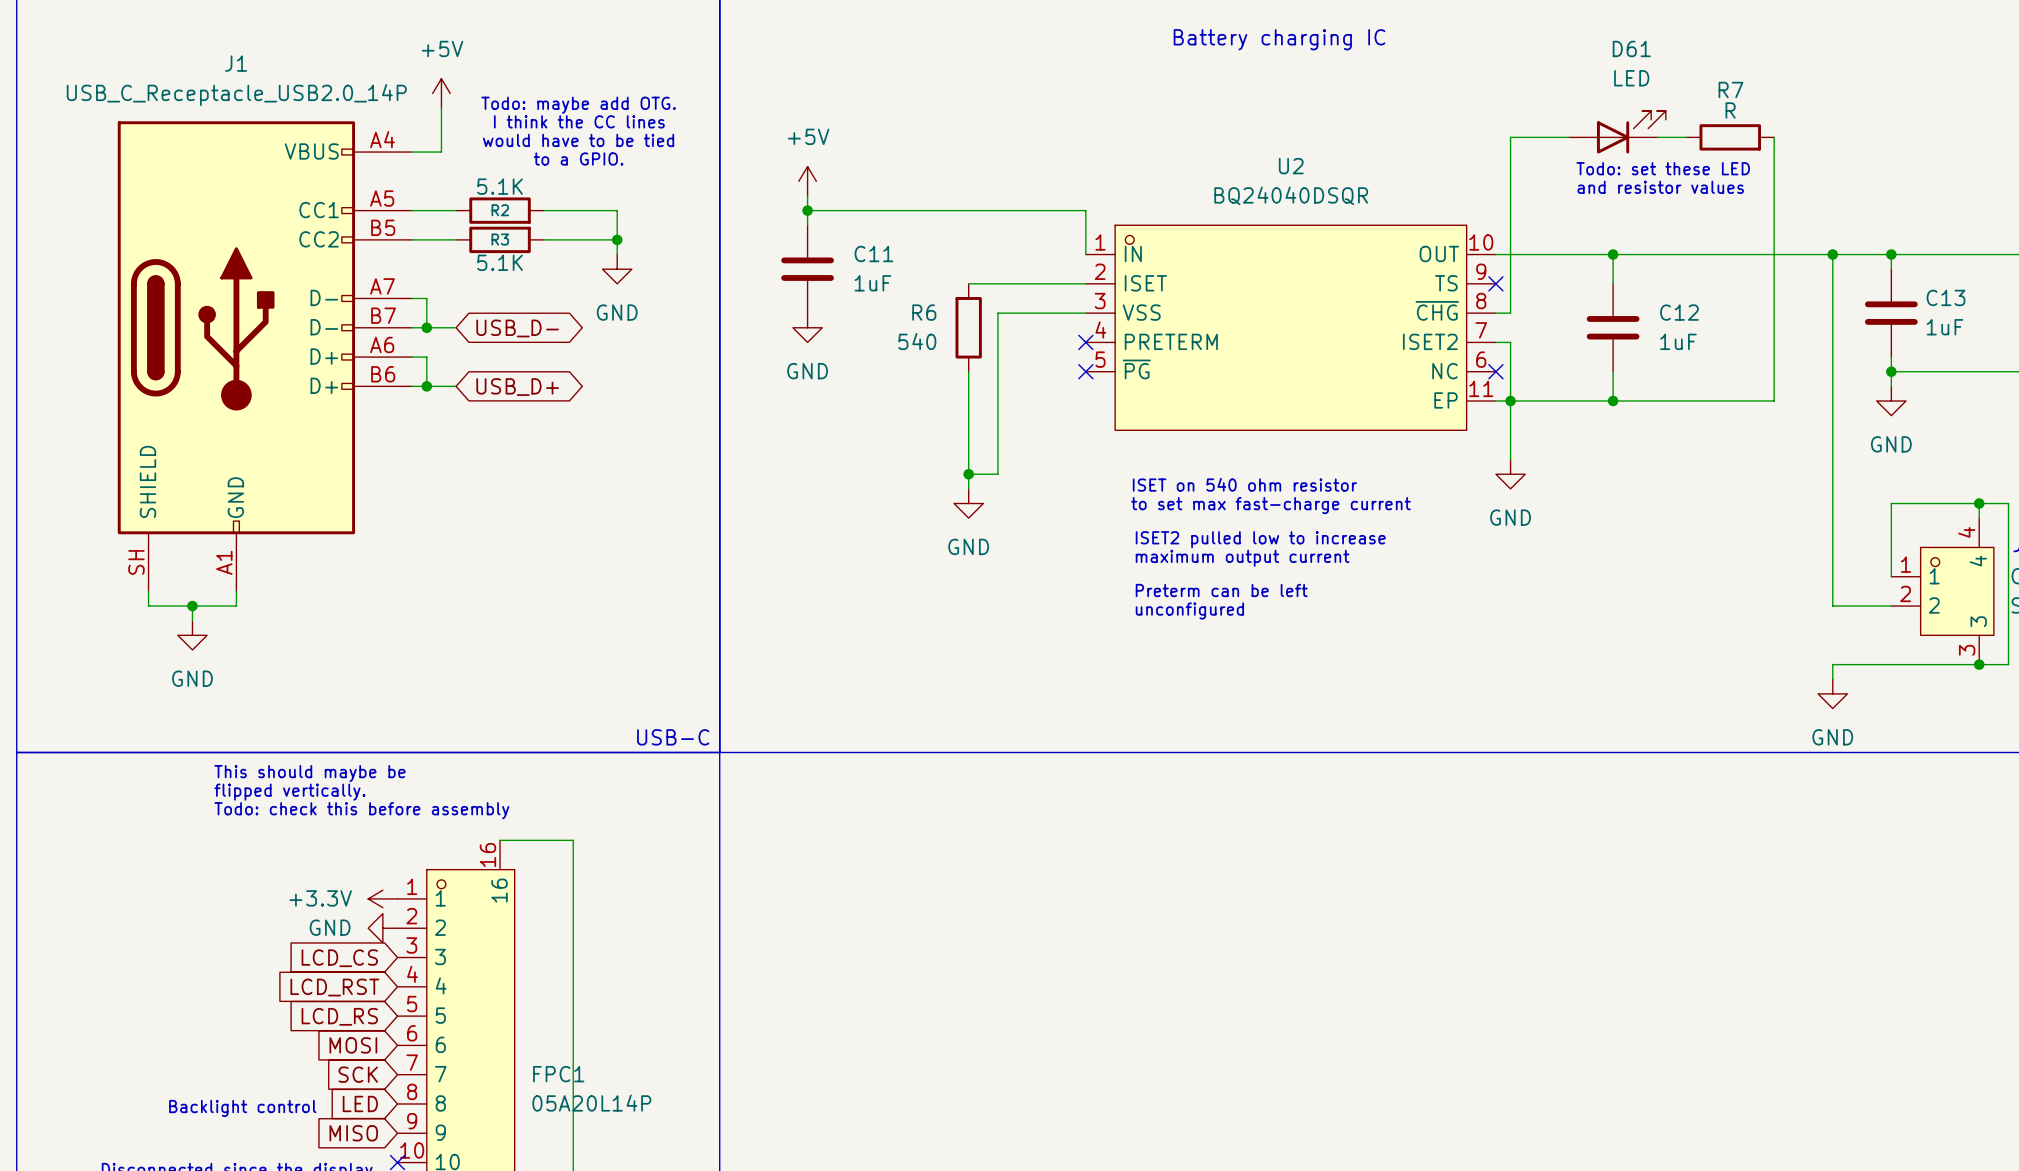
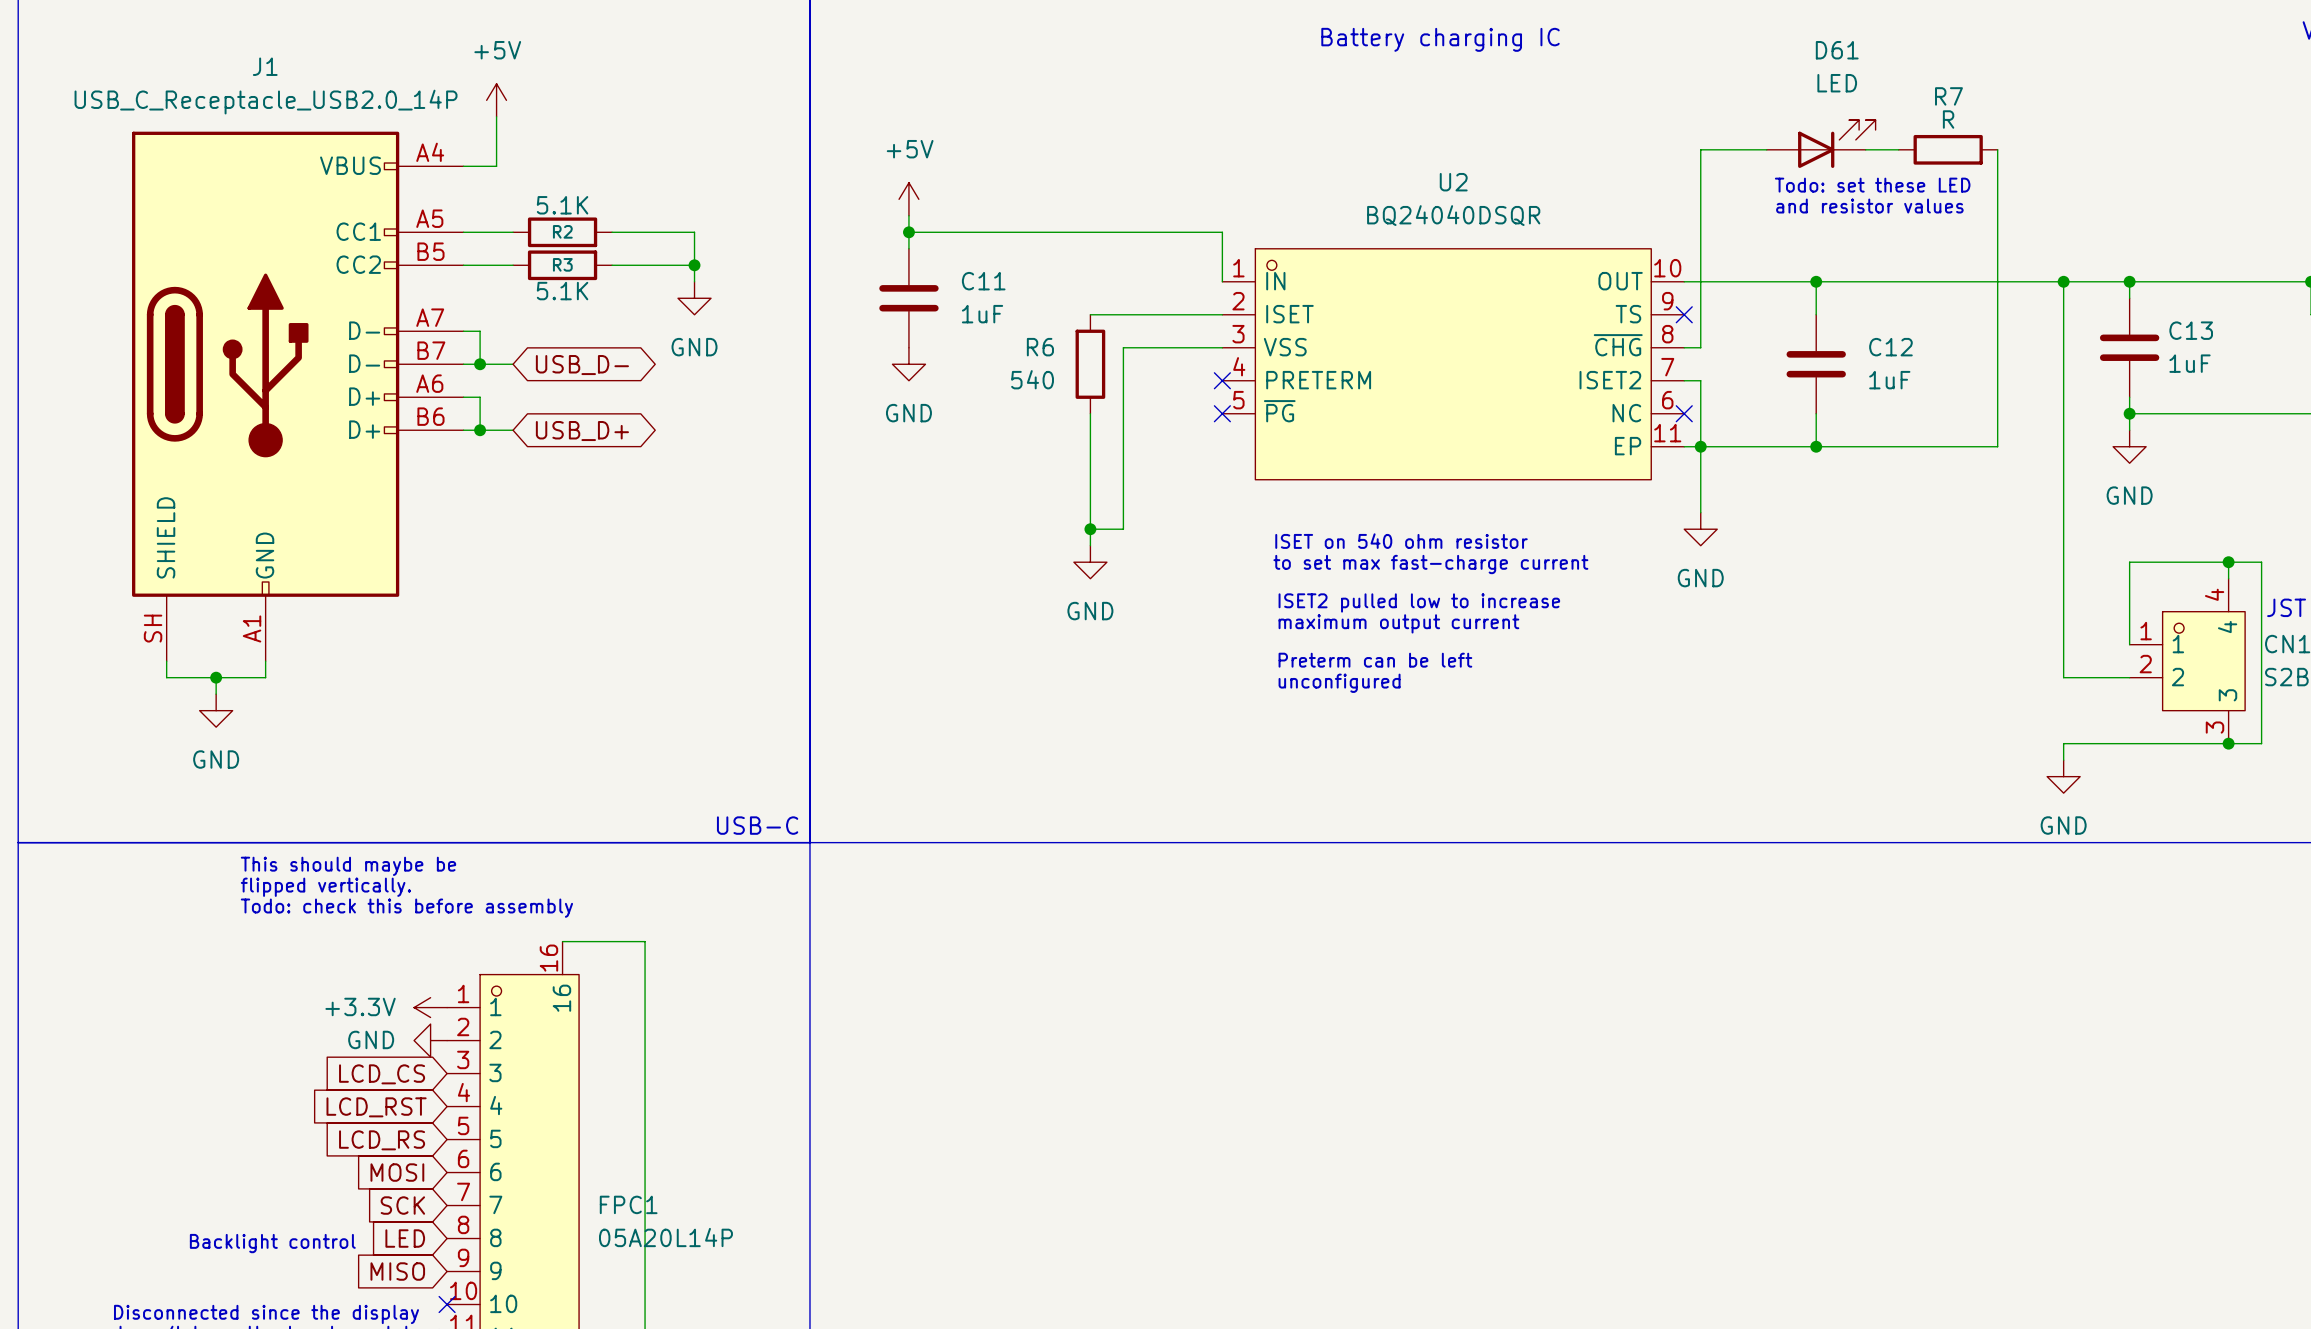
text: Todo: maybe add OTG. (578, 105) -> none
text: I think the CC lines (579, 121) -> none
text: would have to be tied (578, 140) -> none
text: to a GPIO. (578, 158) -> none

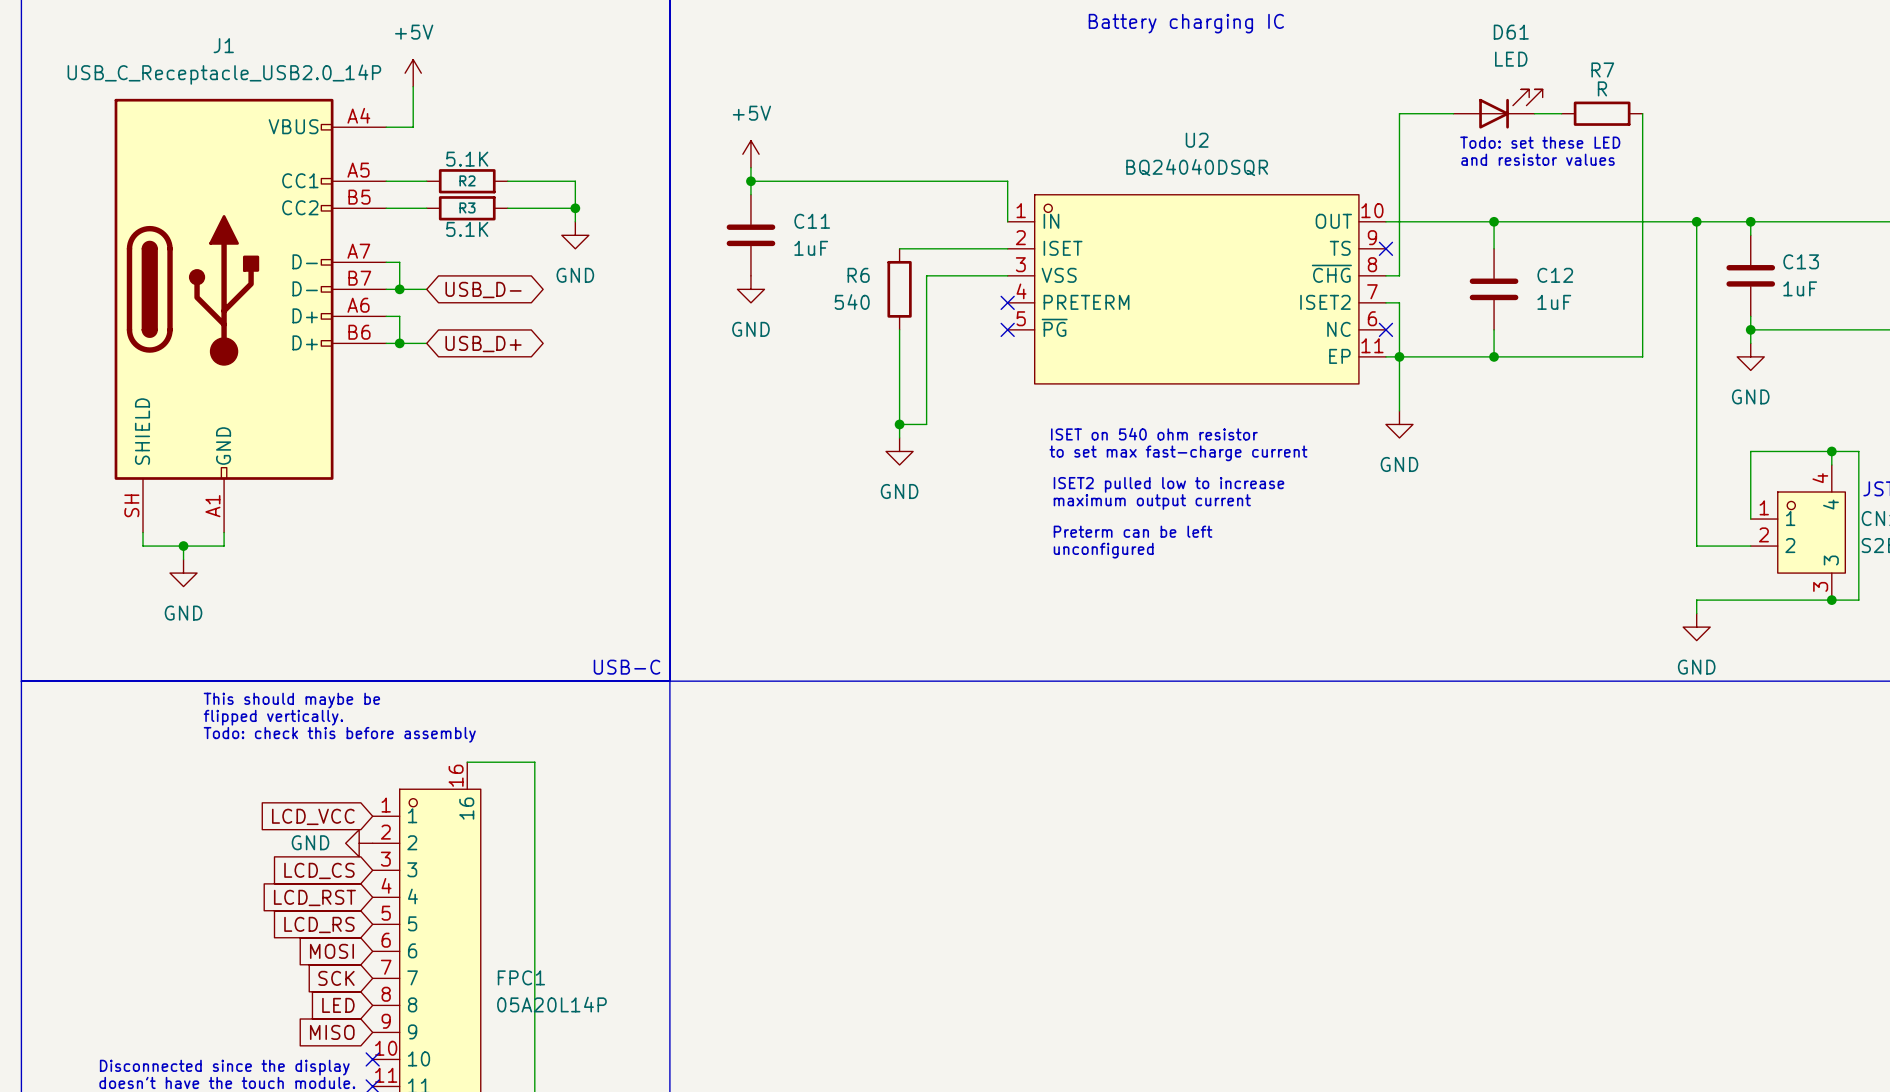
power symbol: +3.3V (430, 1007) -> none
global label: none -> LCD_VCC (313, 816)
text: Backlight control (272, 1243) -> none

